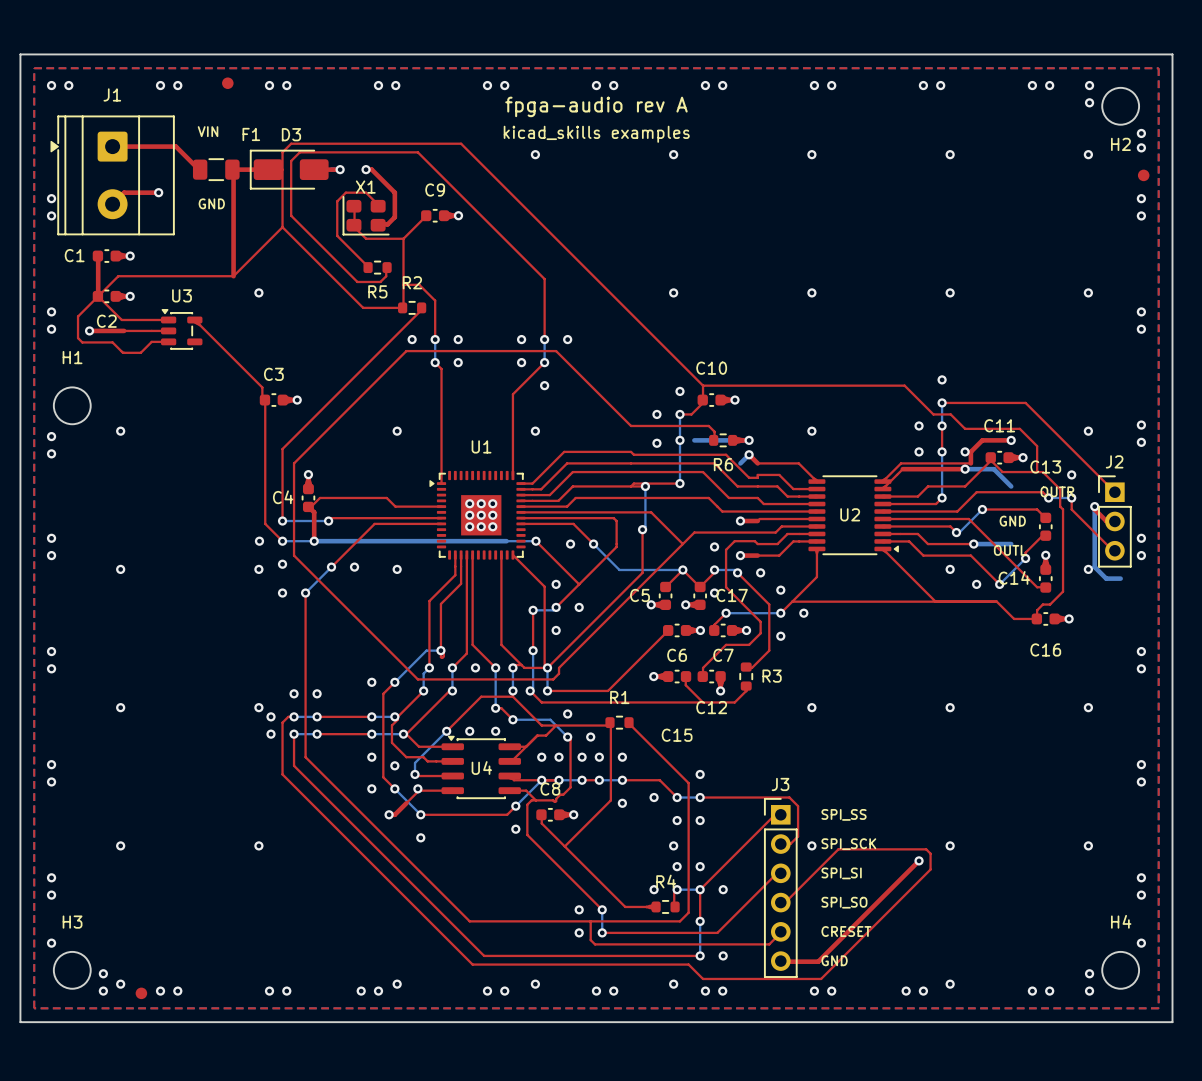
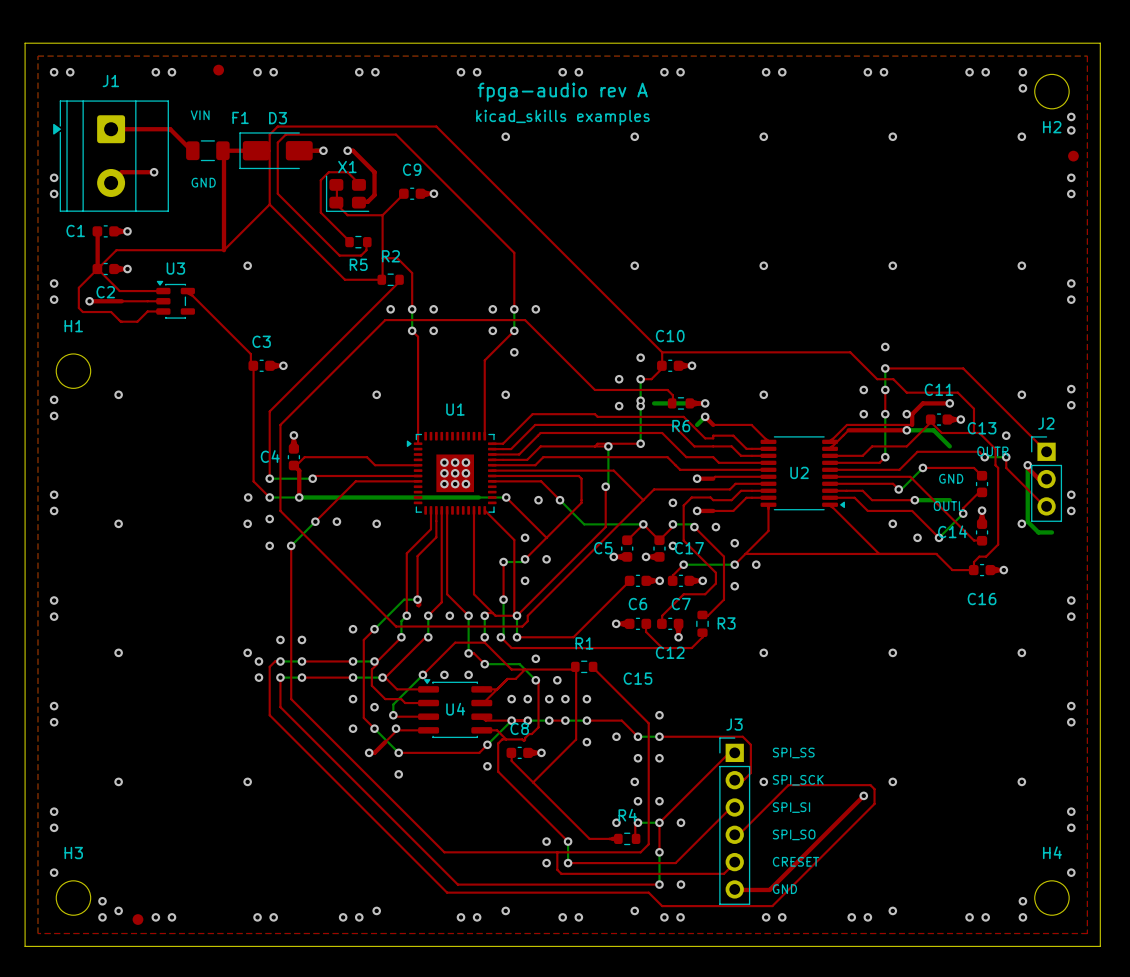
via: none -> (640, 400)
via: (679, 440) -> none
via: none -> (640, 406)

